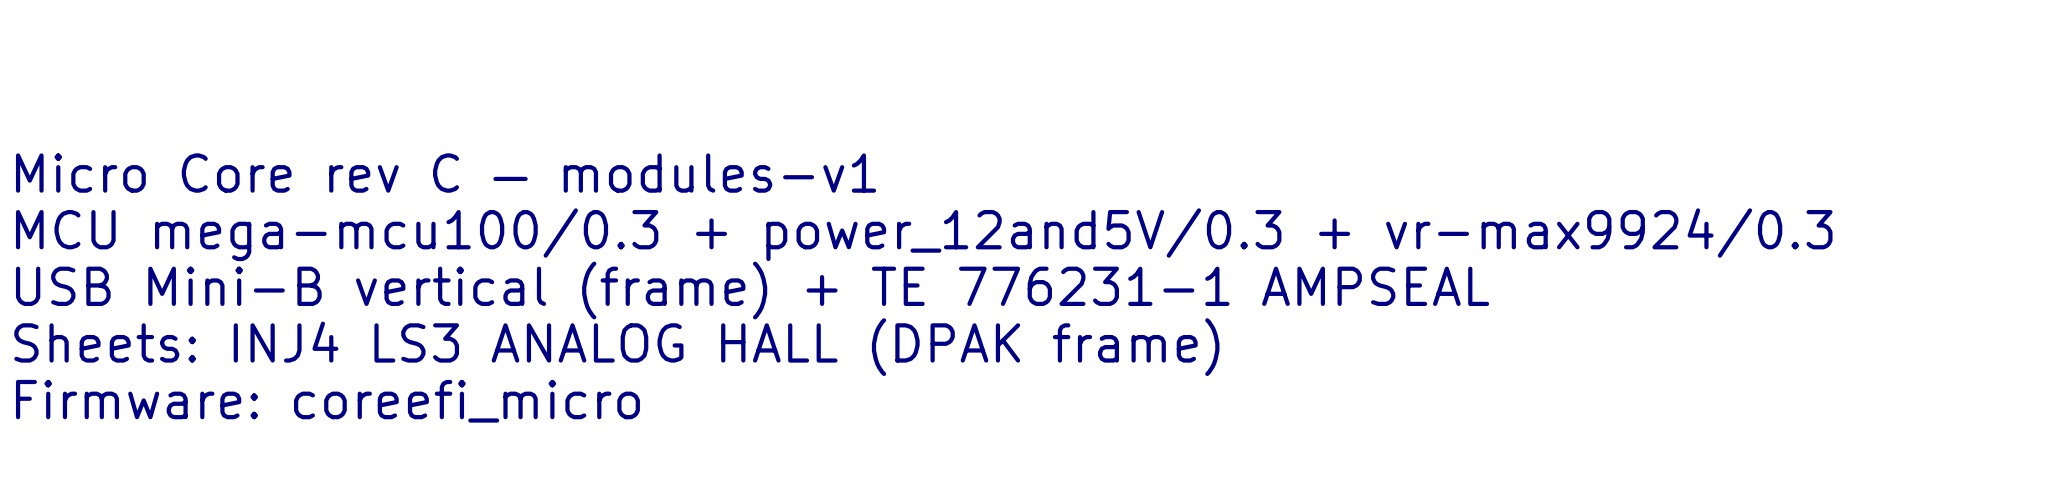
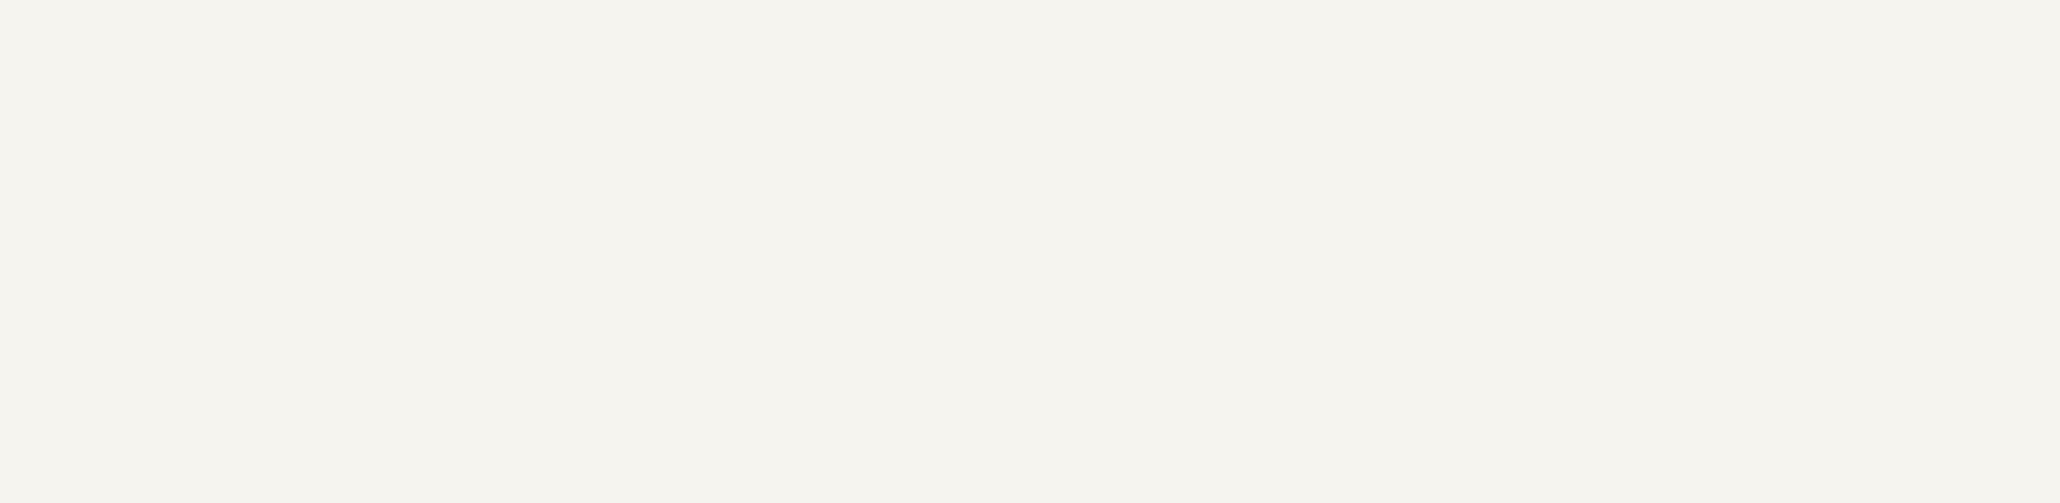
text: Micro Core rev C — modules-v1 (446, 173) -> none
text: MCU mega-mcu100/0.3 + power_12and5V/0.3 + vr-max9924/0.3 (924, 234) -> none
text: USB Mini-B vertical (frame) + TE 776231-1 AMPSEAL (752, 290) -> none
text: Sheets: INJ4 LS3 ANALOG HALL (DPAK frame) (616, 347) -> none
text: Firmware: coreefi_micro (327, 401) -> none

